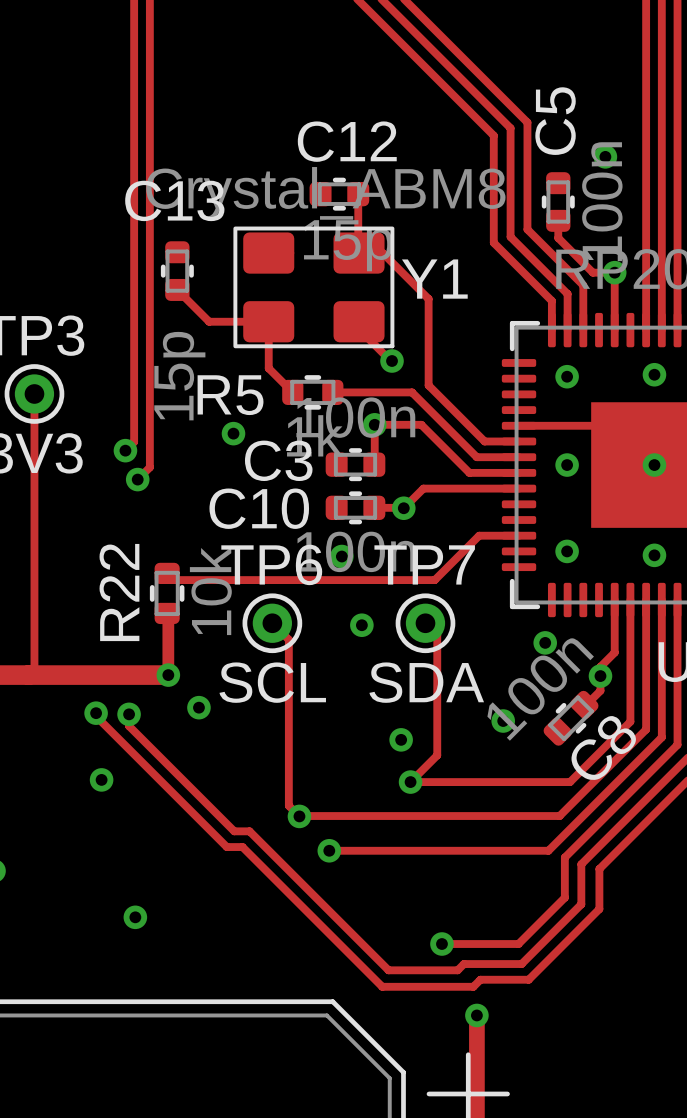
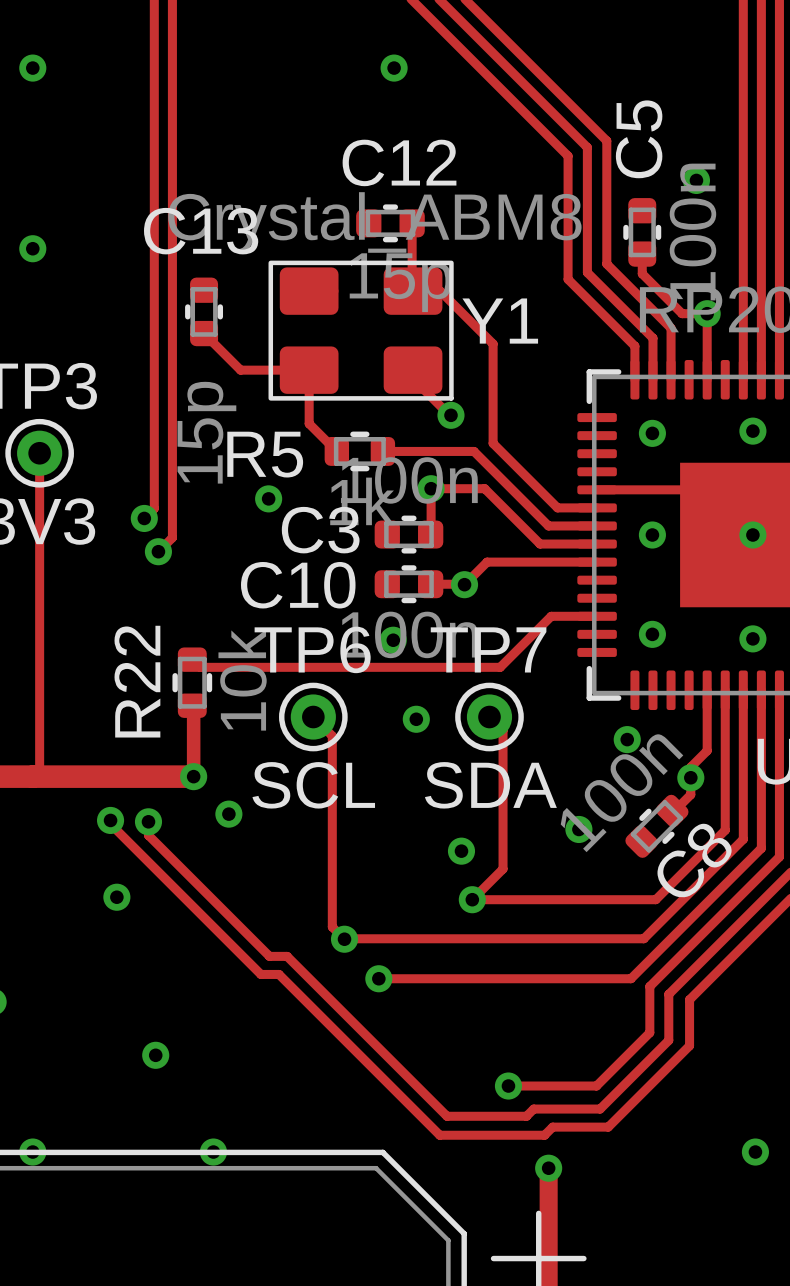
via: none -> (32, 68)
via: none -> (394, 68)
via: none -> (32, 248)
via: none -> (32, 1152)
via: none -> (213, 1152)
via: none -> (755, 1152)

